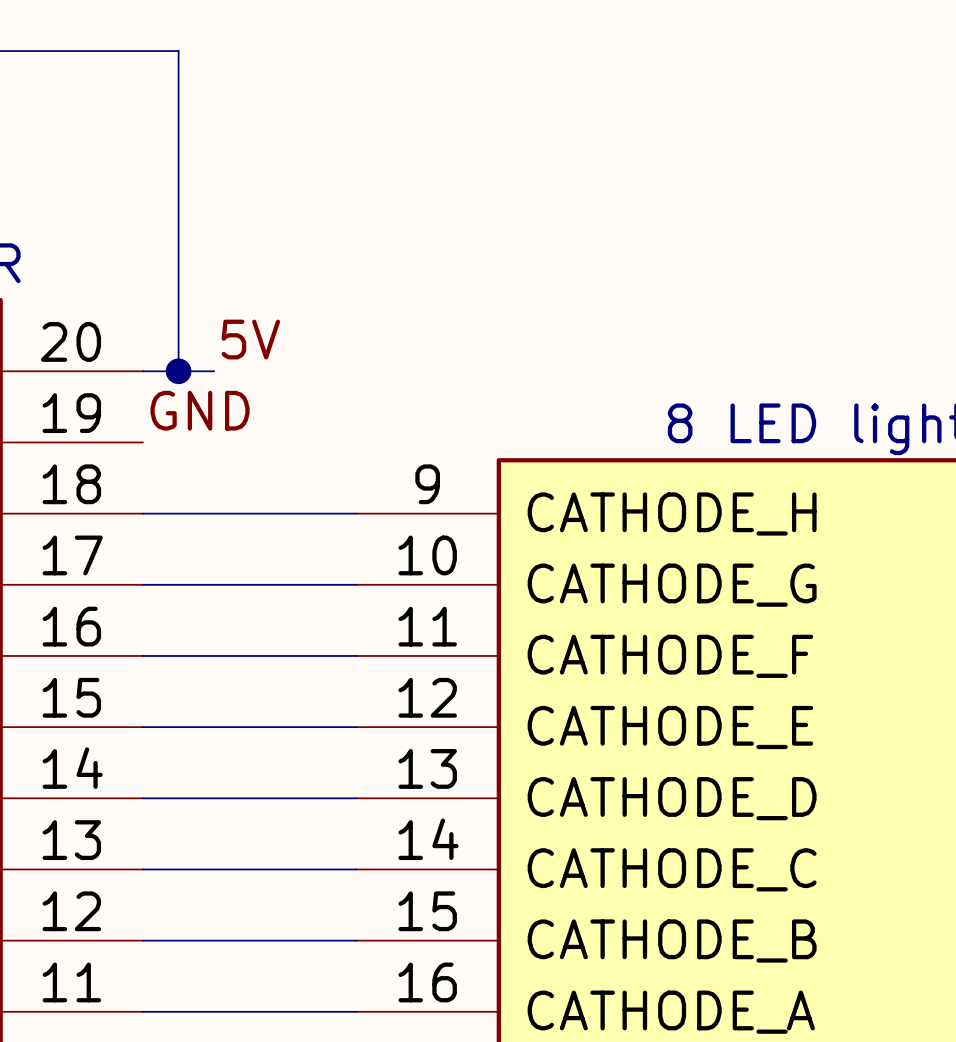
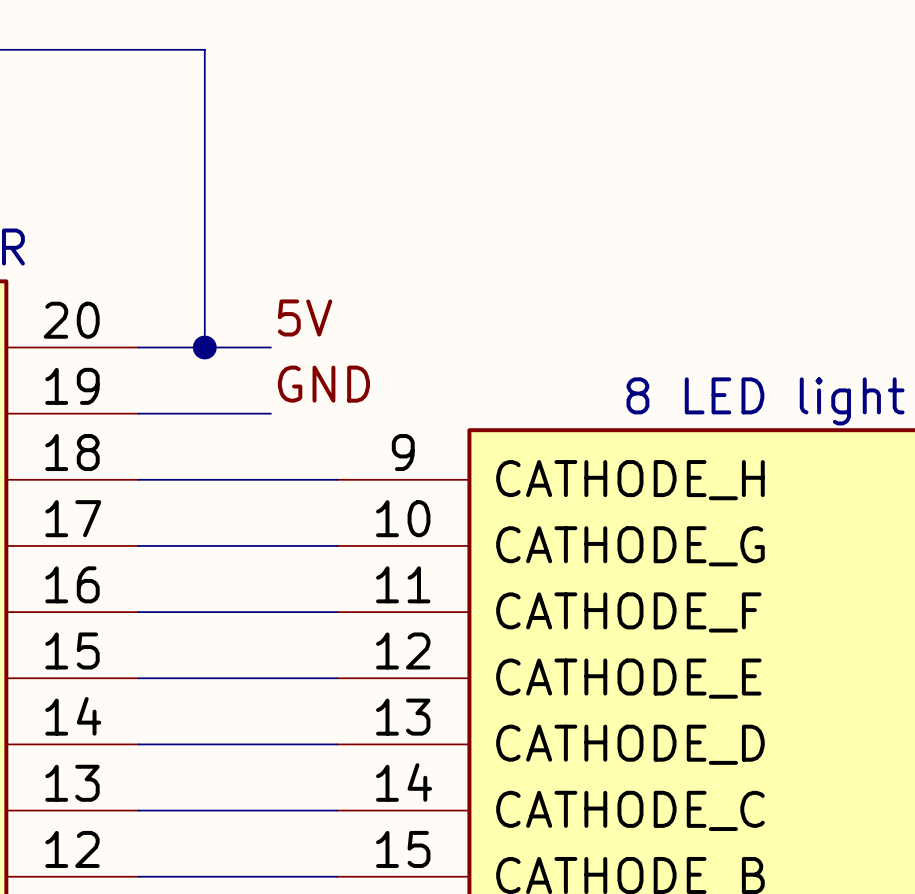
wire: (178, 51) (178, 371) -> (171, 49) (204, 49) (204, 347) (270, 347)
label position: 5V (250, 339) -> 5V (305, 317)
junction position: (178, 371) -> (204, 347)
label position: GND (200, 410) -> GND (323, 384)
wire: none -> (138, 413) (270, 413)

